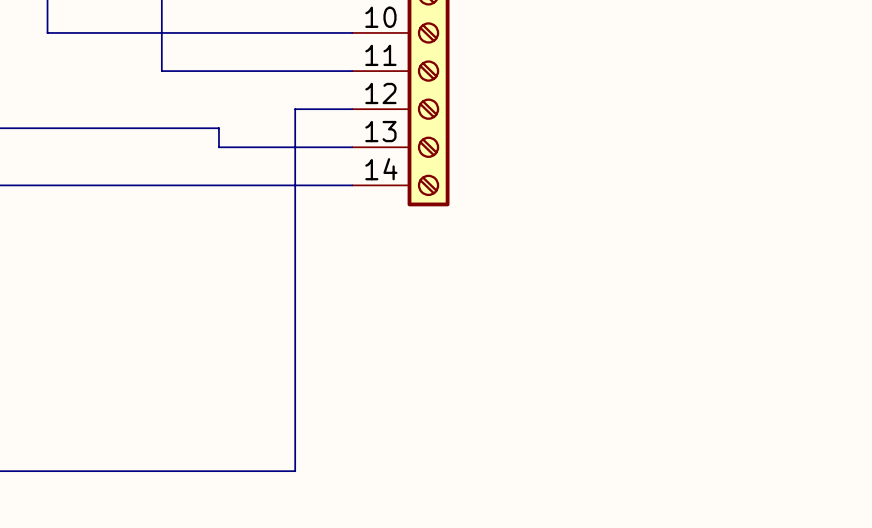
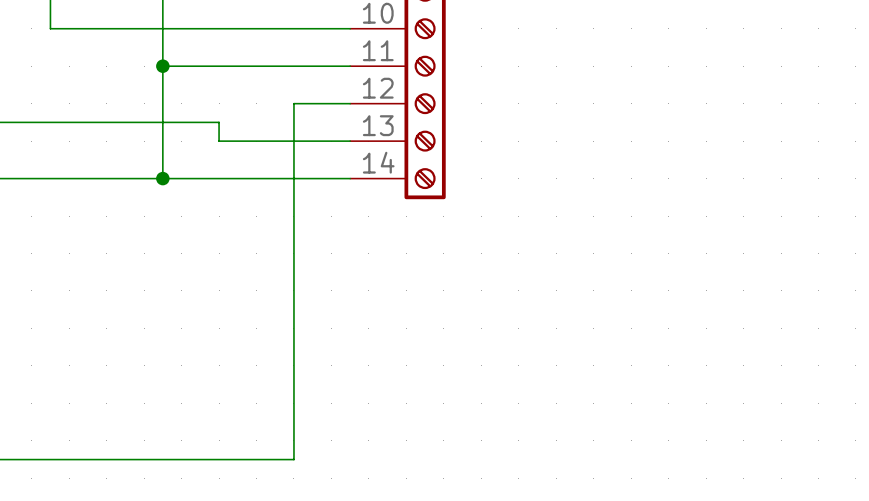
wire: none -> (162, 66) (162, 178)
junction: none -> (162, 66)
junction: none -> (162, 178)

